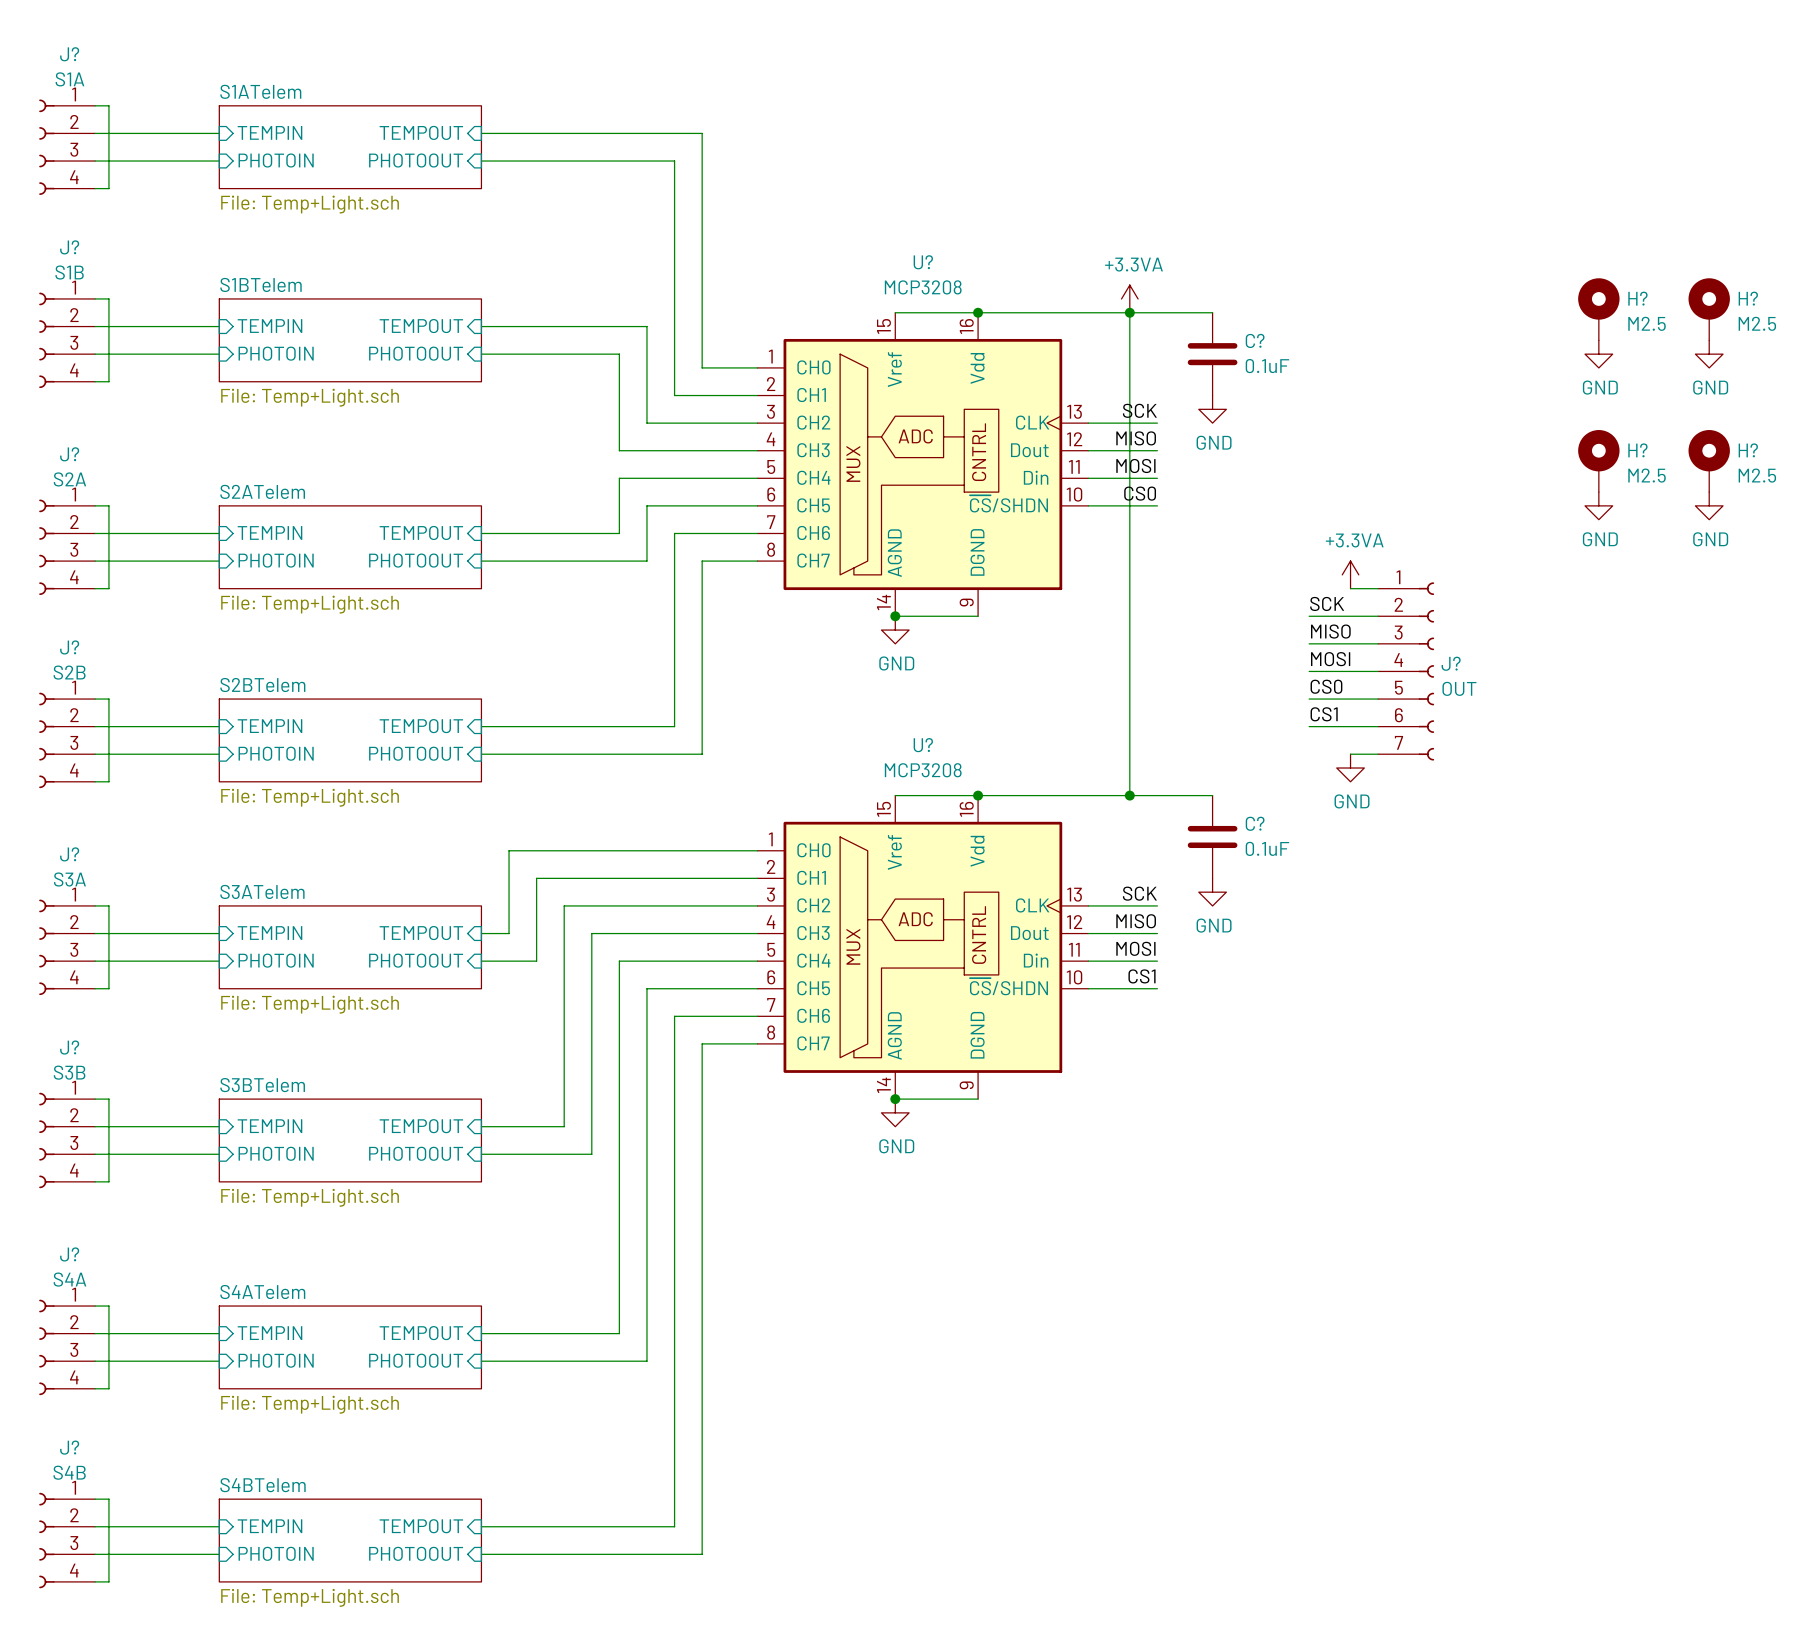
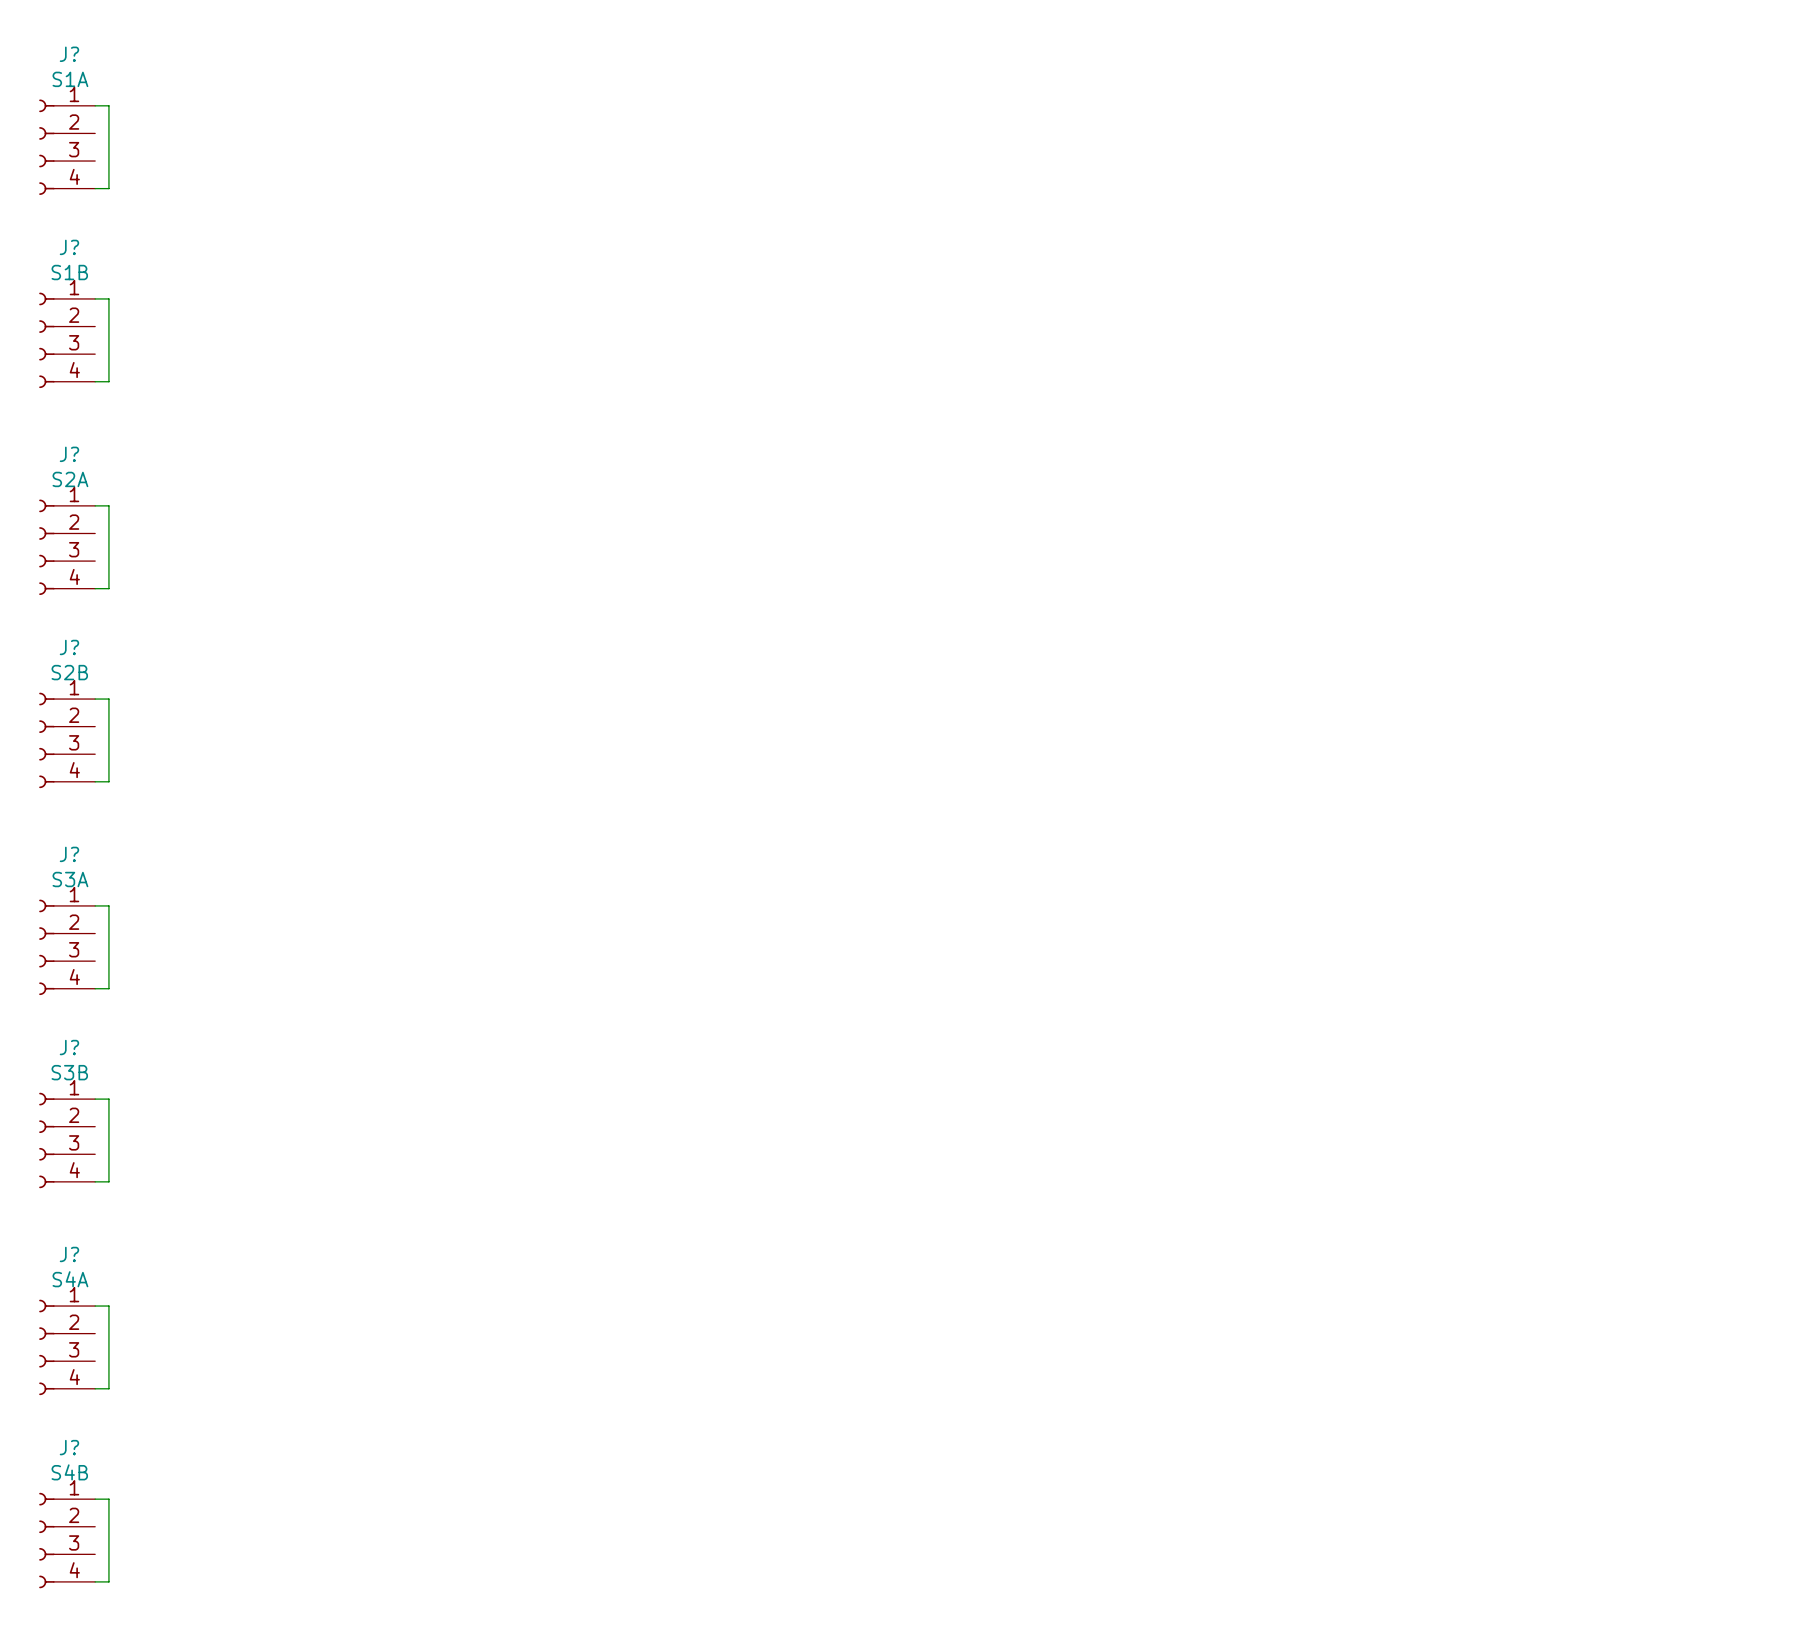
sheet pin: TEMPIN (270, 132) -> none
sheet pin: TEMPOUT (421, 132) -> none
wire: (95, 133) (219, 133) -> none
wire: (481, 133) (702, 133) (702, 367) (757, 367) -> none
sheet S1ATelem: File: Temp+Light.sch (350, 147) -> none
sheet pin: PHOTOIN (276, 160) -> none
sheet pin: PHOTOOUT (416, 160) -> none
wire: (95, 161) (219, 161) -> none
wire: (481, 161) (674, 161) (674, 395) (757, 395) -> none
power symbol: +3.3VA (1129, 298) -> none
H?: M2.5 (1598, 309) -> none
H?: M2.5 (1709, 309) -> none
wire: (895, 312) (1212, 312) -> none
junction: (978, 312) -> none
wire: (1129, 312) (1129, 795) -> none
junction: (1129, 312) -> none
wire: (95, 326) (219, 326) -> none
sheet pin: TEMPIN (270, 326) -> none
sheet pin: TEMPOUT (421, 326) -> none
wire: (481, 326) (646, 326) (646, 423) (757, 423) -> none
sheet S1BTelem: File: Temp+Light.sch (350, 340) -> none
sheet pin: PHOTOIN (276, 353) -> none
sheet pin: PHOTOOUT (416, 353) -> none
wire: (95, 354) (219, 354) -> none
wire: (481, 354) (619, 354) (619, 450) (757, 450) -> none
C?: 0.1uF (1212, 354) -> none
power symbol: GND (1598, 354) -> none
power symbol: GND (1709, 354) -> none
power symbol: GND (1212, 409) -> none
label: SCK (1139, 410) -> none
wire: (1088, 423) (1157, 423) -> none
label: MISO (1136, 438) -> none
wire: (1088, 450) (1157, 450) -> none
H?: M2.5 (1598, 461) -> none
H?: M2.5 (1709, 461) -> none
U?: MCP3208 (922, 464) -> none
label: MOSI (1135, 465) -> none
wire: (757, 478) (619, 478) (619, 533) (481, 533) -> none
wire: (1088, 478) (1157, 478) -> none
label: CS0 (1140, 493) -> none
wire: (757, 505) (646, 505) (646, 561) (481, 561) -> none
wire: (1088, 505) (1157, 505) -> none
power symbol: GND (1598, 505) -> none
power symbol: GND (1709, 505) -> none
sheet pin: TEMPIN (270, 532) -> none
sheet pin: TEMPOUT (421, 532) -> none
wire: (95, 533) (219, 533) -> none
wire: (757, 533) (674, 533) (674, 726) (481, 726) -> none
sheet S2ATelem: File: Temp+Light.sch (350, 547) -> none
sheet pin: PHOTOIN (276, 560) -> none
sheet pin: PHOTOOUT (416, 560) -> none
wire: (95, 561) (219, 561) -> none
wire: (757, 561) (702, 561) (702, 754) (481, 754) -> none
power symbol: +3.3VA (1350, 574) -> none
wire: (1350, 588) (1378, 588) -> none
label: SCK (1327, 603) -> none
wire: (895, 616) (978, 616) -> none
junction: (895, 616) -> none
wire: (1309, 616) (1378, 616) -> none
power symbol: GND (895, 630) -> none
label: MISO (1330, 631) -> none
wire: (1309, 643) (1378, 643) -> none
label: MOSI (1330, 659) -> none
wire: (1309, 671) (1378, 671) -> none
J?: OUT (1406, 671) -> none
label: CS0 (1326, 686) -> none
wire: (1309, 699) (1378, 699) -> none
label: CS1 (1324, 714) -> none
wire: (95, 726) (219, 726) -> none
sheet pin: TEMPIN (270, 726) -> none
sheet pin: TEMPOUT (421, 726) -> none
wire: (1309, 726) (1378, 726) -> none
sheet S2BTelem: File: Temp+Light.sch (350, 740) -> none
sheet pin: PHOTOIN (276, 753) -> none
sheet pin: PHOTOOUT (416, 753) -> none
wire: (95, 754) (219, 754) -> none
wire: (1350, 754) (1378, 754) -> none
power symbol: GND (1350, 768) -> none
wire: (895, 795) (1212, 795) -> none
junction: (978, 795) -> none
junction: (1129, 795) -> none
C?: 0.1uF (1212, 836) -> none
wire: (757, 850) (509, 850) (509, 933) (481, 933) -> none
wire: (757, 878) (536, 878) (536, 961) (481, 961) -> none
power symbol: GND (1212, 892) -> none
label: SCK (1139, 893) -> none
wire: (757, 905) (564, 905) (564, 1126) (481, 1126) -> none
wire: (1088, 905) (1157, 905) -> none
label: MISO (1136, 921) -> none
wire: (95, 933) (219, 933) -> none
sheet pin: TEMPIN (270, 933) -> none
sheet pin: TEMPOUT (421, 933) -> none
wire: (757, 933) (591, 933) (591, 1154) (481, 1154) -> none
wire: (1088, 933) (1157, 933) -> none
sheet S3ATelem: File: Temp+Light.sch (350, 947) -> none
U?: MCP3208 (922, 947) -> none
label: MOSI (1135, 948) -> none
sheet pin: PHOTOIN (276, 960) -> none
sheet pin: PHOTOOUT (416, 960) -> none
wire: (95, 961) (219, 961) -> none
wire: (757, 961) (619, 961) (619, 1333) (481, 1333) -> none
wire: (1088, 961) (1157, 961) -> none
label: CS1 (1142, 976) -> none
wire: (757, 988) (646, 988) (646, 1361) (481, 1361) -> none
wire: (1088, 988) (1157, 988) -> none
wire: (757, 1016) (674, 1016) (674, 1526) (481, 1526) -> none
wire: (757, 1043) (702, 1043) (702, 1554) (481, 1554) -> none
wire: (895, 1099) (978, 1099) -> none
junction: (895, 1099) -> none
power symbol: GND (895, 1112) -> none
wire: (95, 1126) (219, 1126) -> none
sheet pin: TEMPIN (270, 1126) -> none
sheet pin: TEMPOUT (421, 1126) -> none
sheet S3BTelem: File: Temp+Light.sch (350, 1140) -> none
sheet pin: PHOTOIN (276, 1153) -> none
sheet pin: PHOTOOUT (416, 1153) -> none
wire: (95, 1154) (219, 1154) -> none
wire: (95, 1333) (219, 1333) -> none
sheet pin: TEMPIN (270, 1333) -> none
sheet pin: TEMPOUT (421, 1333) -> none
sheet S4ATelem: File: Temp+Light.sch (350, 1347) -> none
sheet pin: PHOTOIN (276, 1360) -> none
sheet pin: PHOTOOUT (416, 1360) -> none
wire: (95, 1361) (219, 1361) -> none
wire: (95, 1526) (219, 1526) -> none
sheet pin: TEMPIN (270, 1526) -> none
sheet pin: TEMPOUT (421, 1526) -> none
sheet S4BTelem: File: Temp+Light.sch (350, 1540) -> none
sheet pin: PHOTOIN (276, 1553) -> none
sheet pin: PHOTOOUT (416, 1553) -> none
wire: (95, 1554) (219, 1554) -> none

